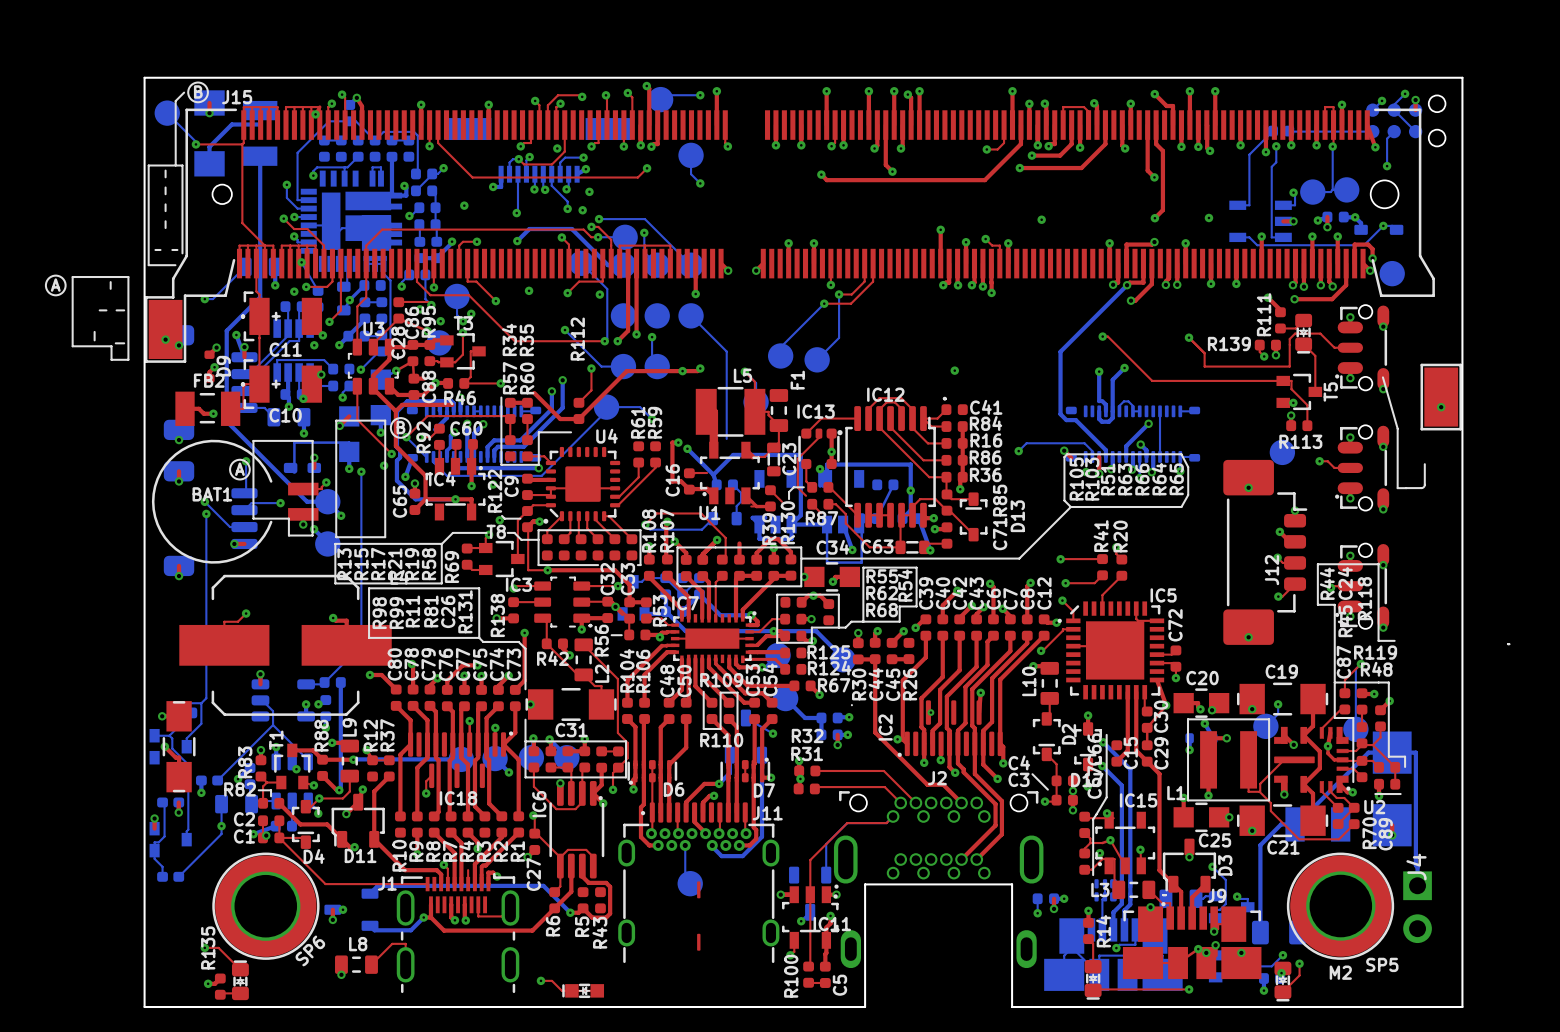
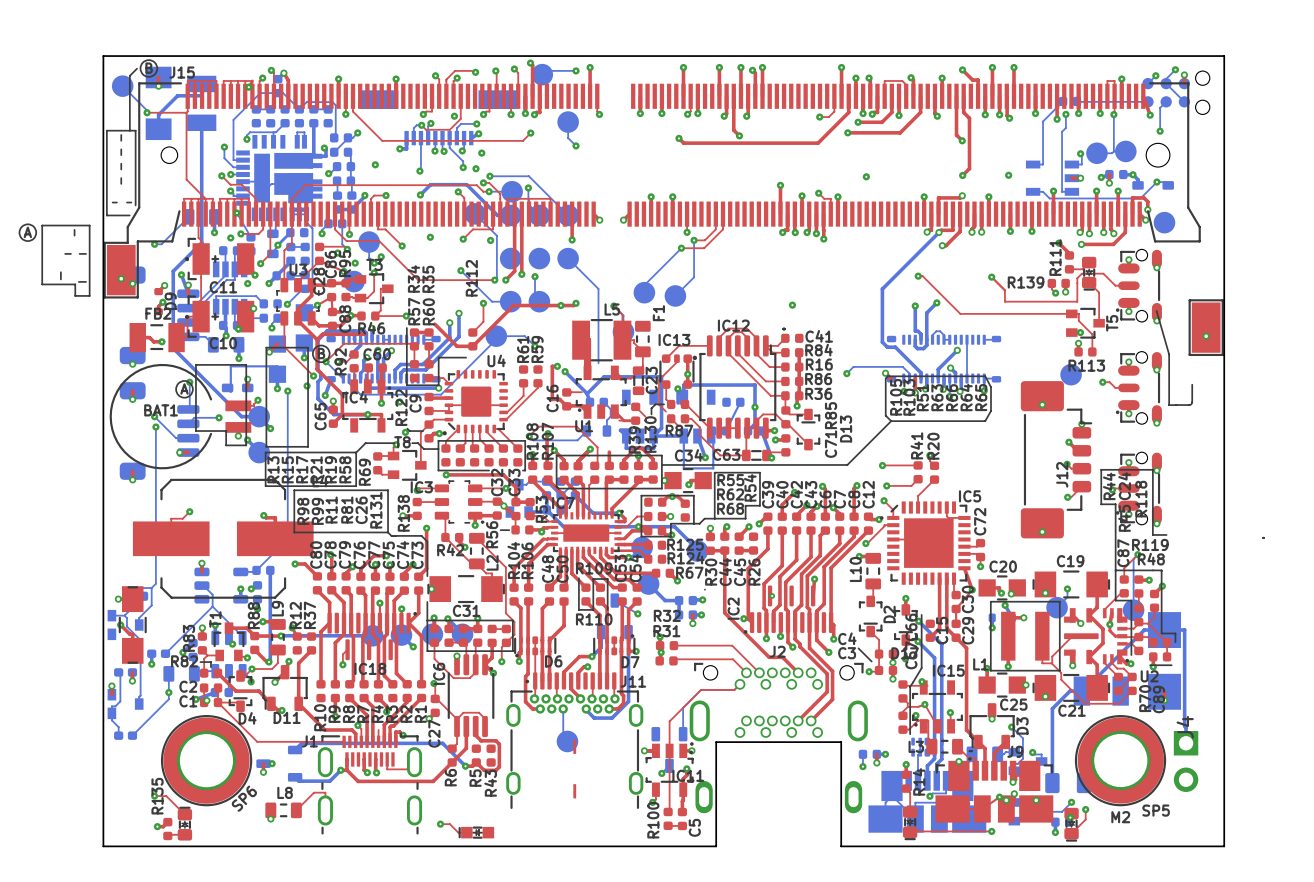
top track: (527, 527) (528, 570) (547, 570) -> none

